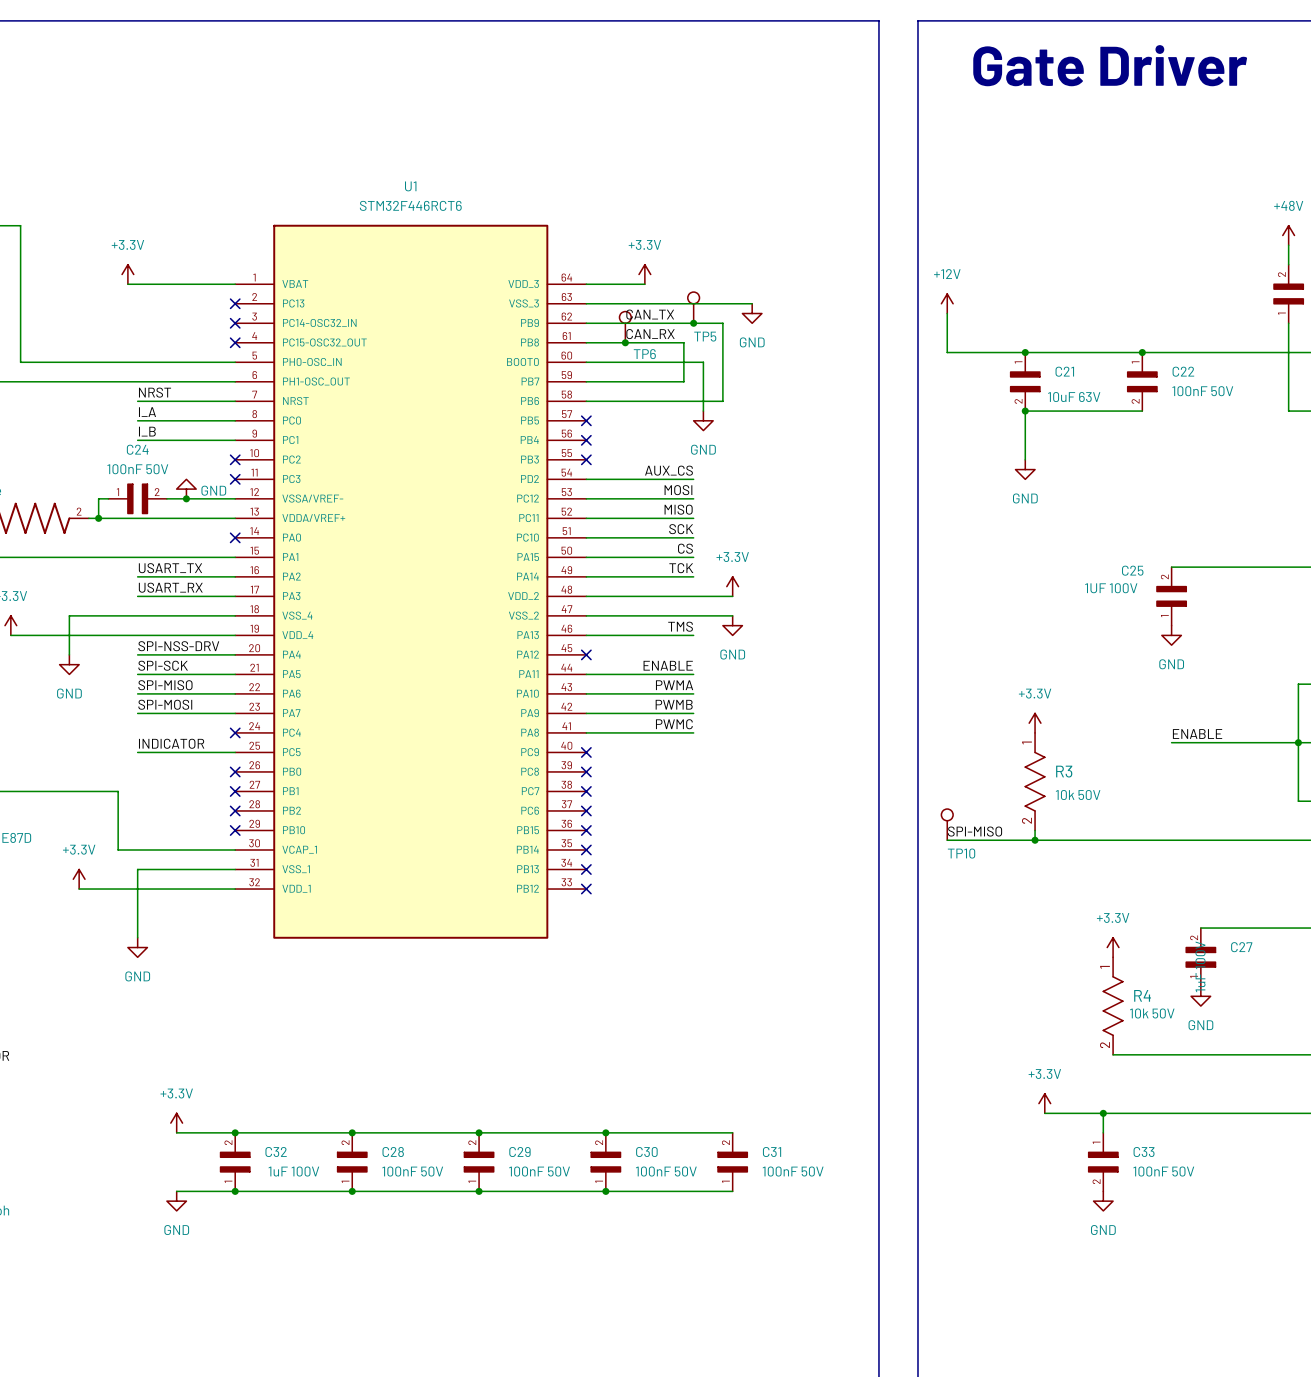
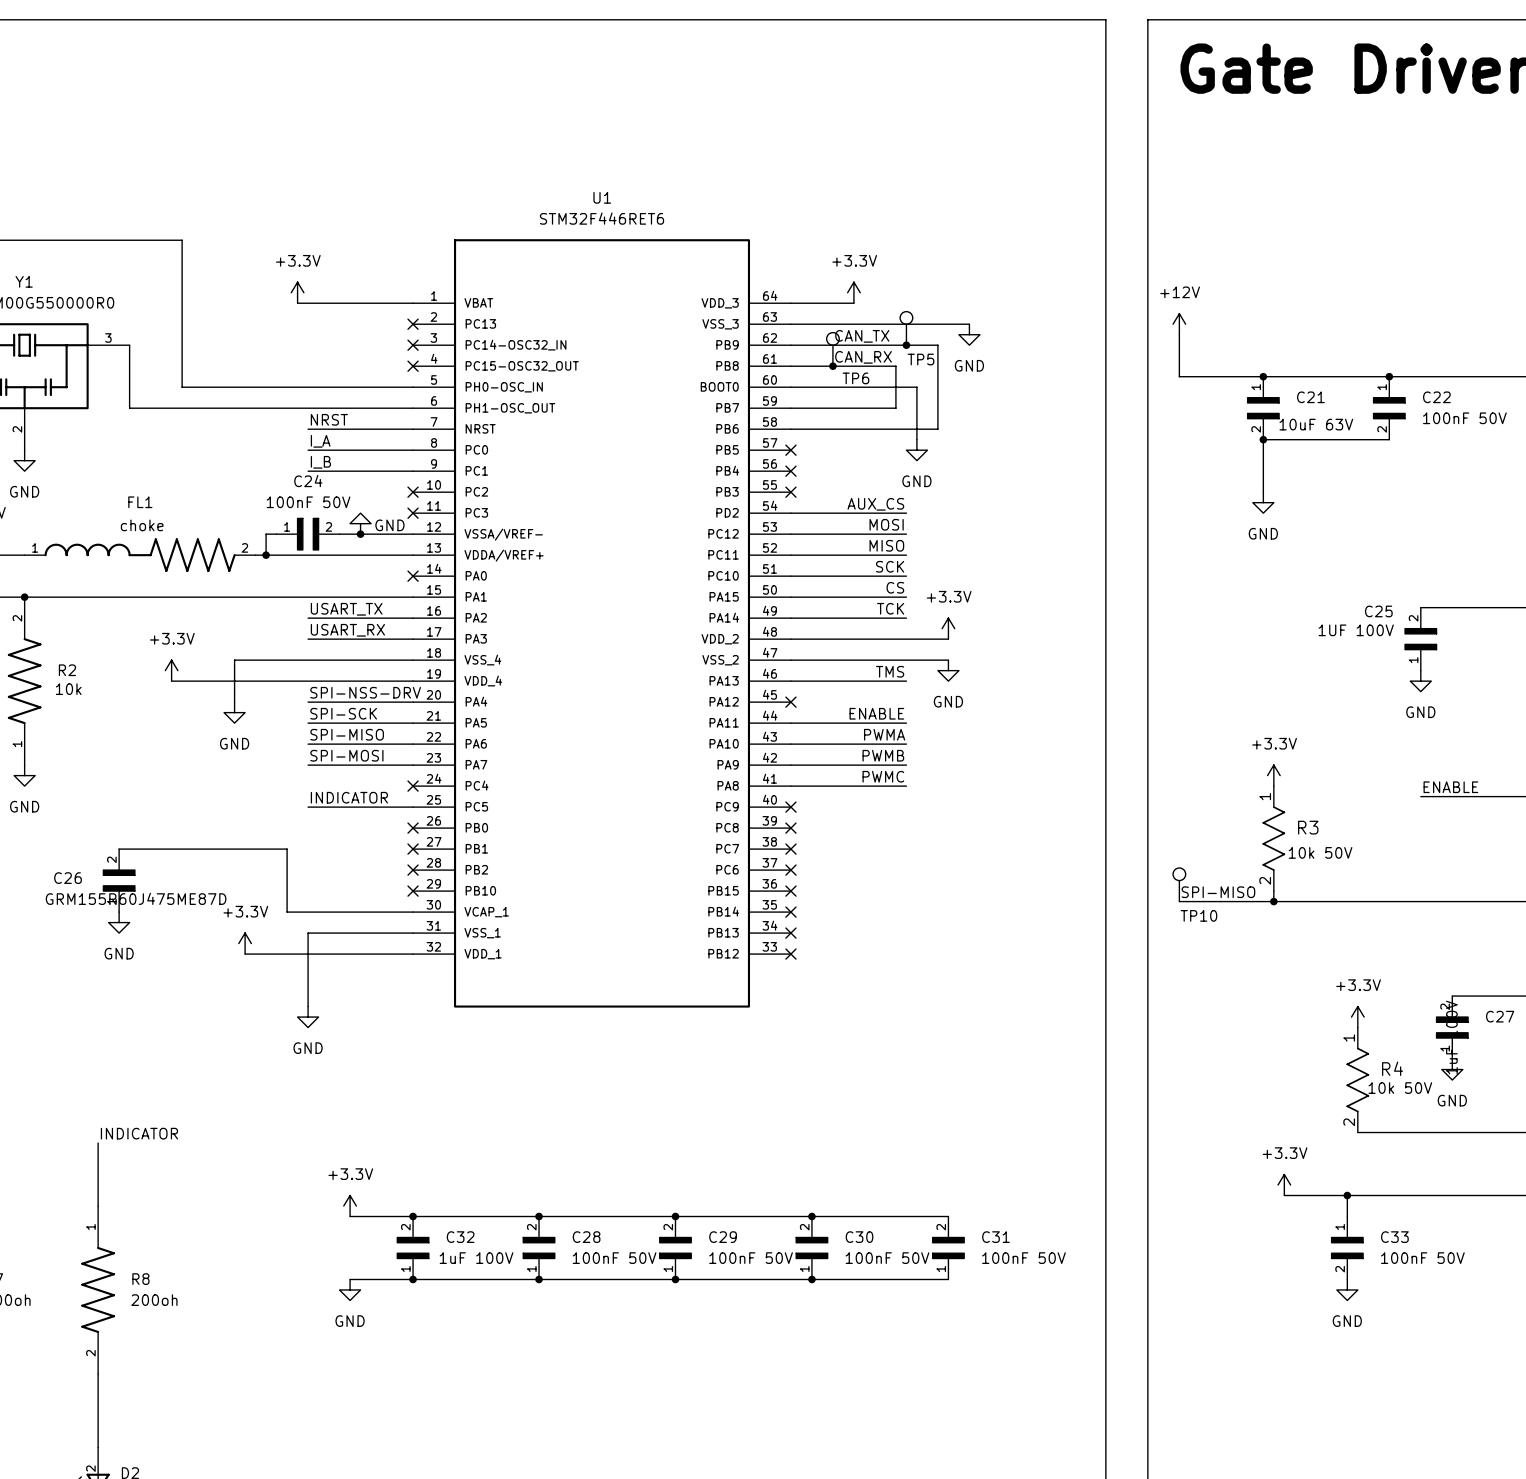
U1 value: STM32F446RCT6 (410, 205) -> STM32F446RET6 (602, 218)

